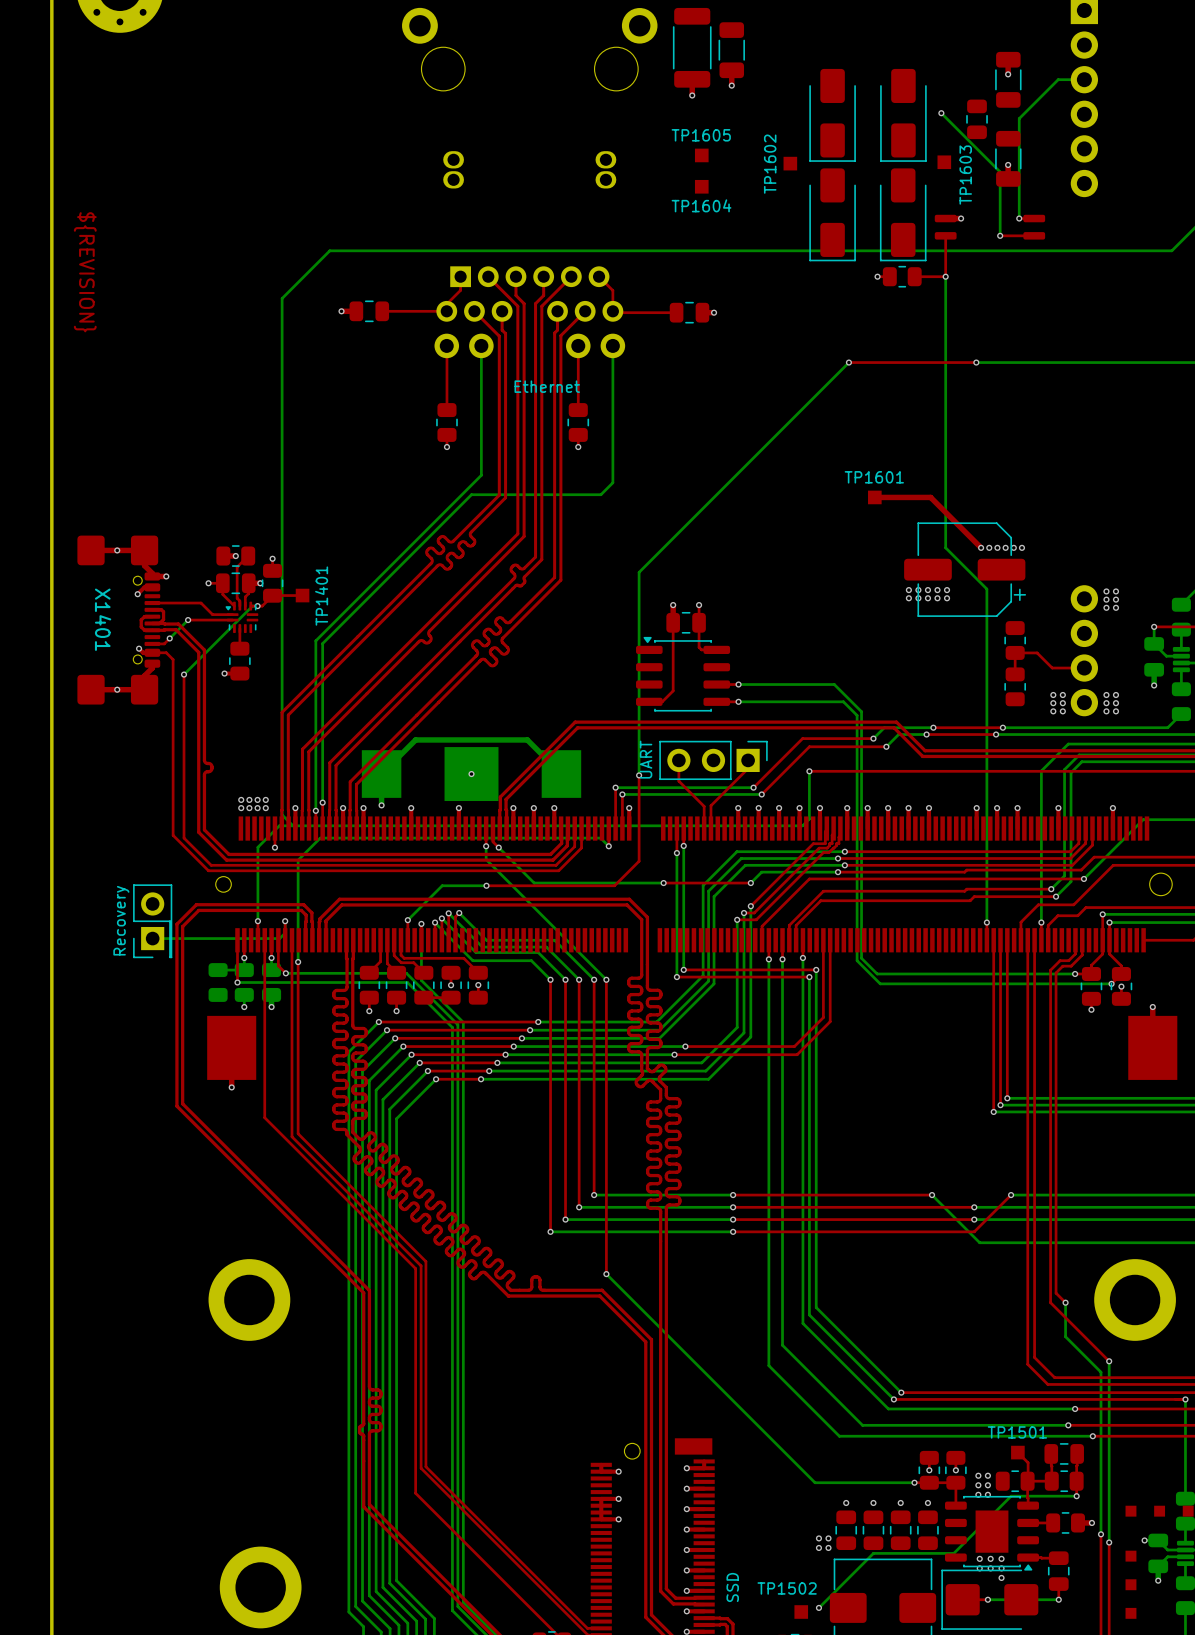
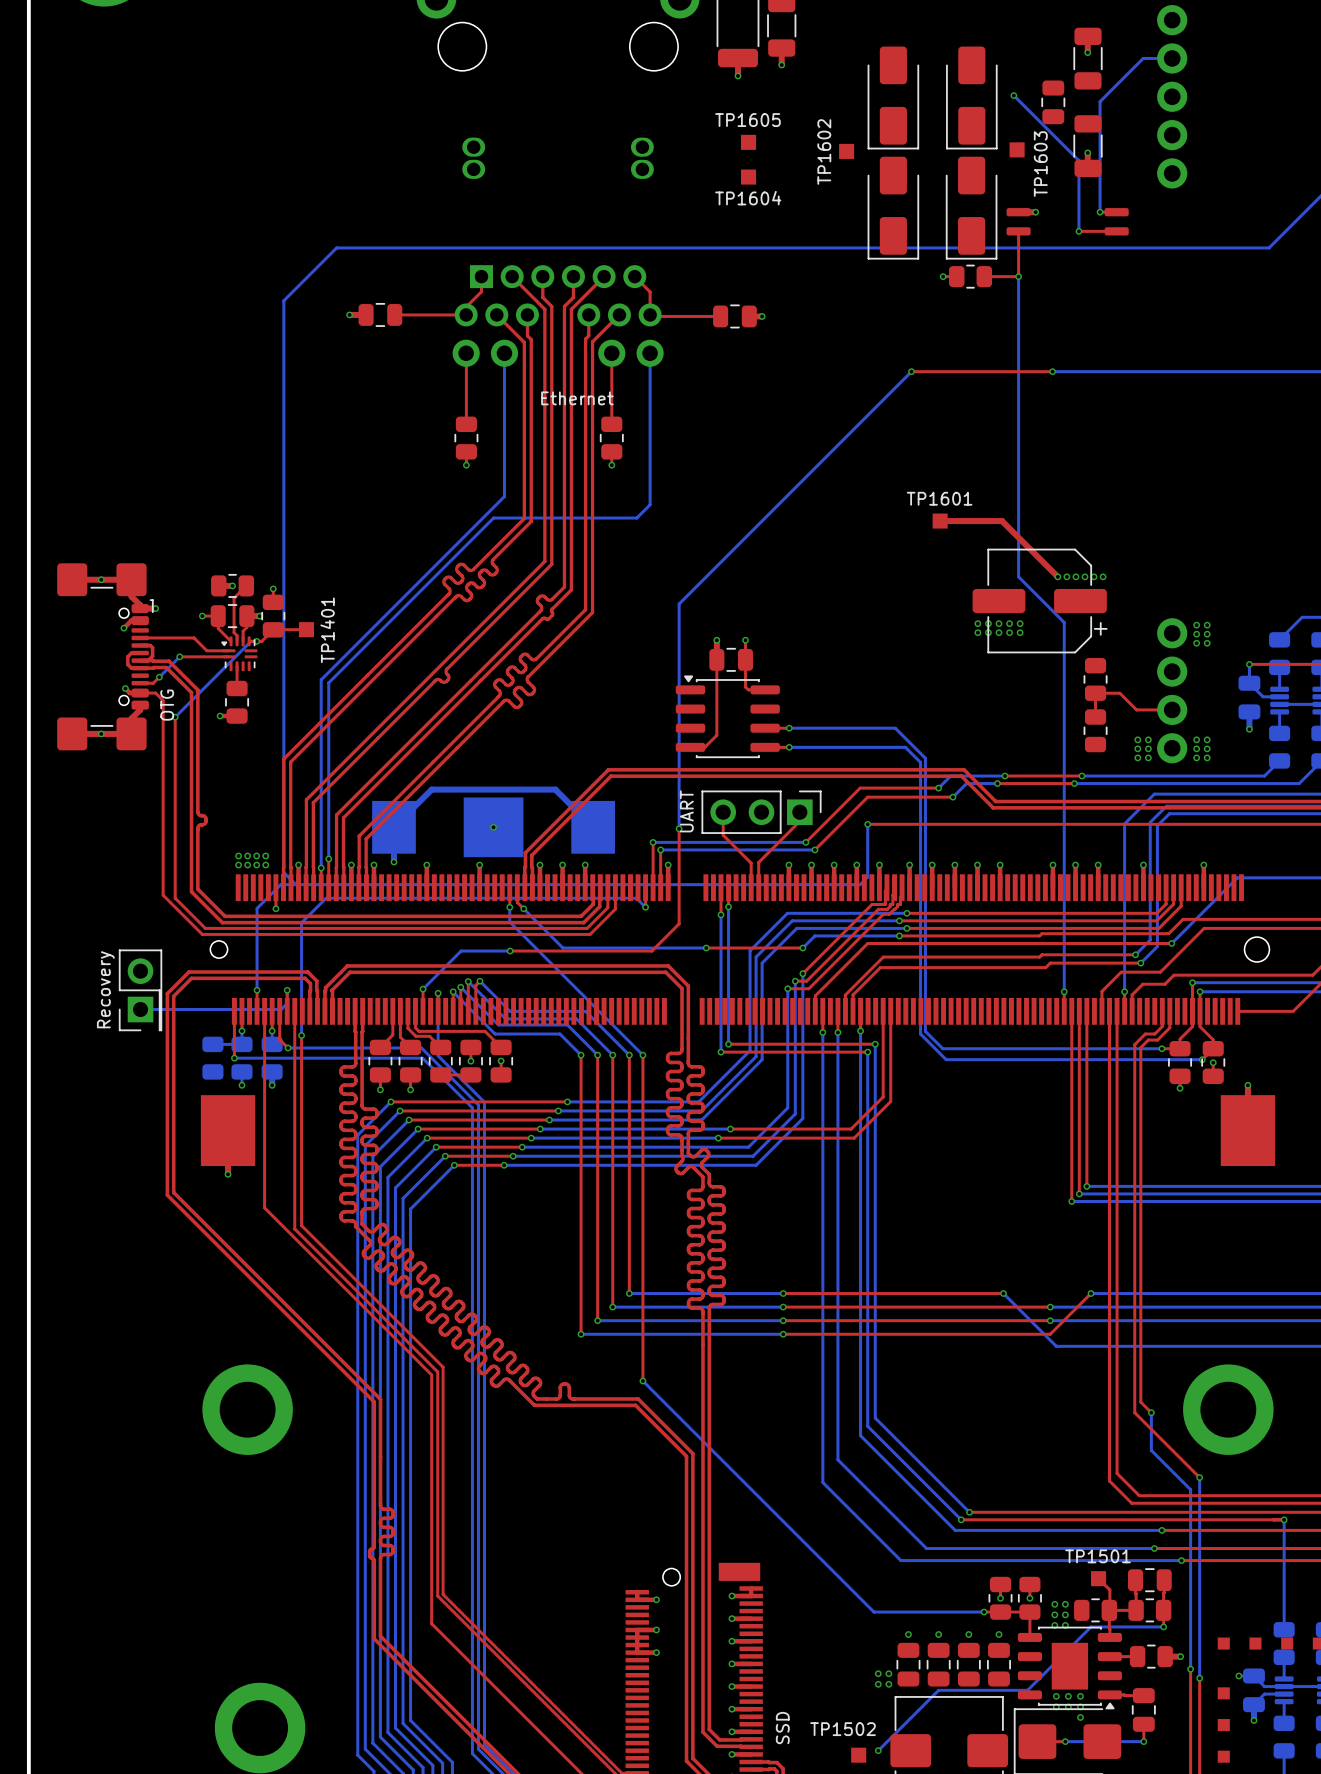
text: ${REVISION} (85, 272) -> none
X1401: (118, 620) -> none
part: none -> OTG (105, 656)

